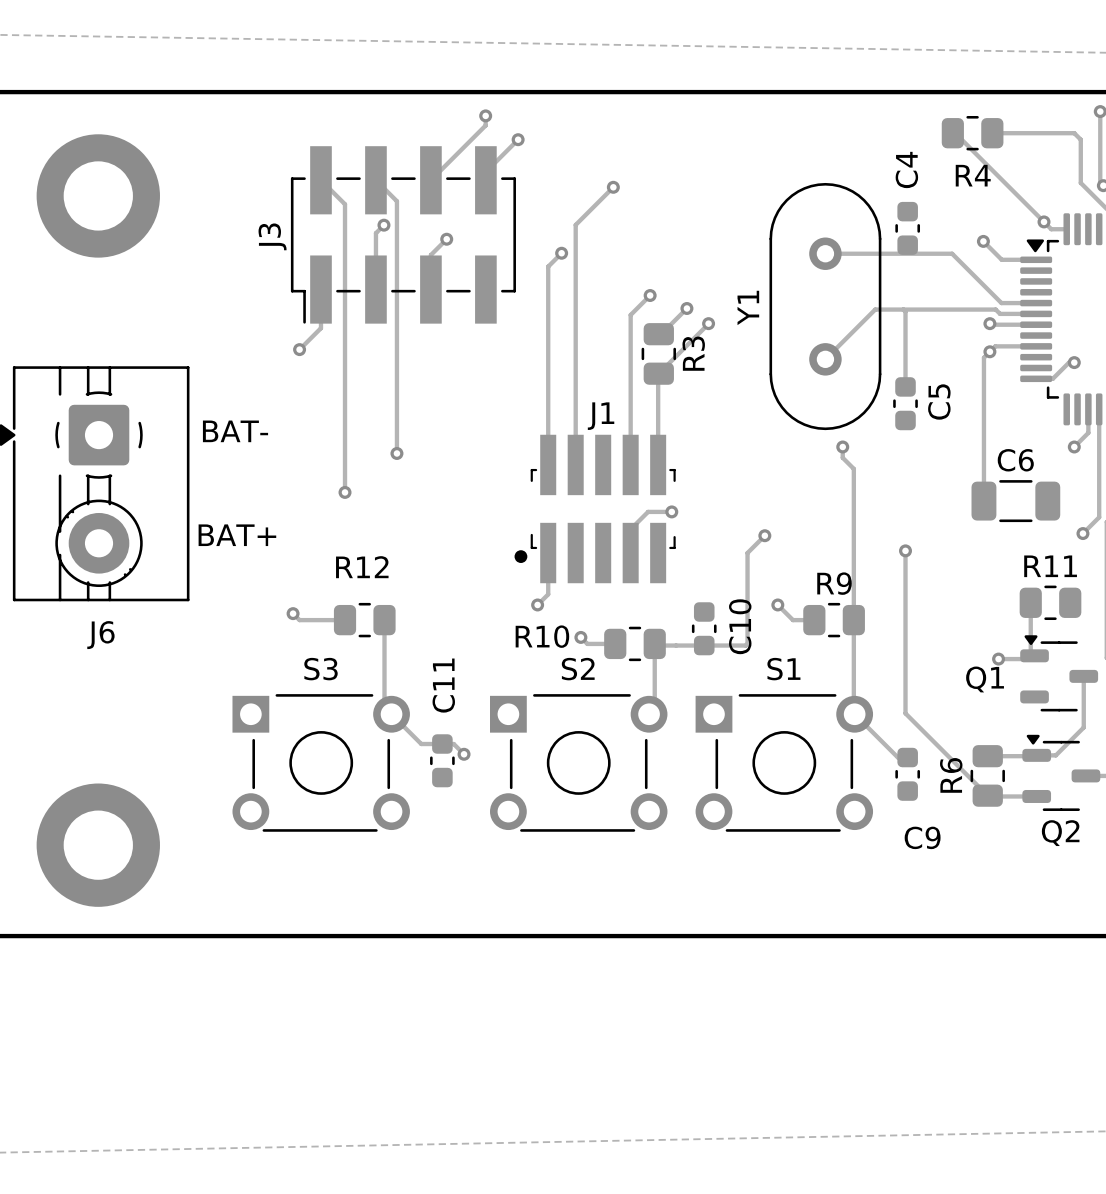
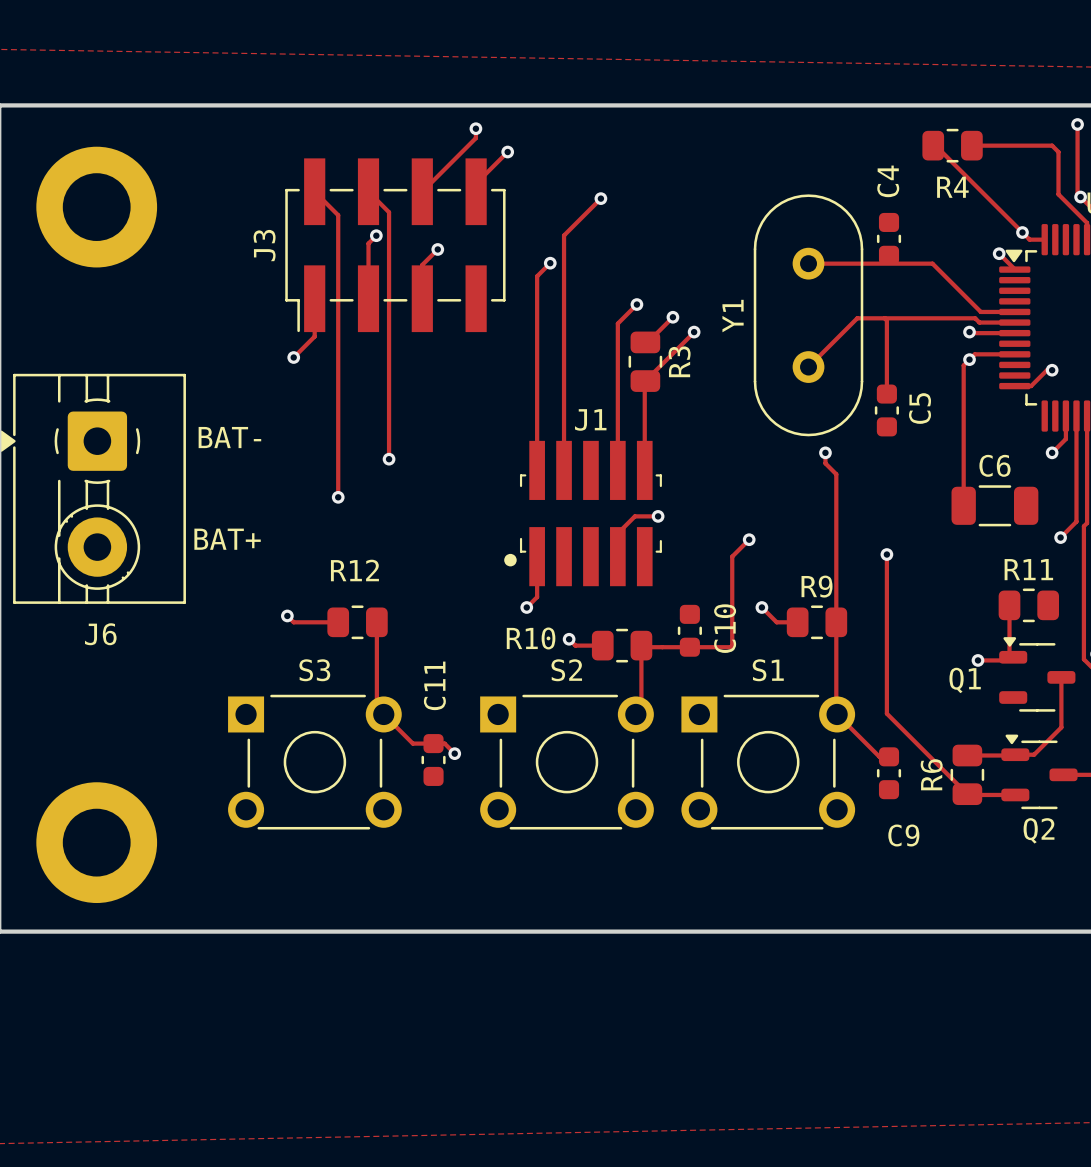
track: (983, 241) (1001, 259) (1036, 259) -> (999, 253) (1014, 269)
via position: (983, 241) -> (999, 253)

